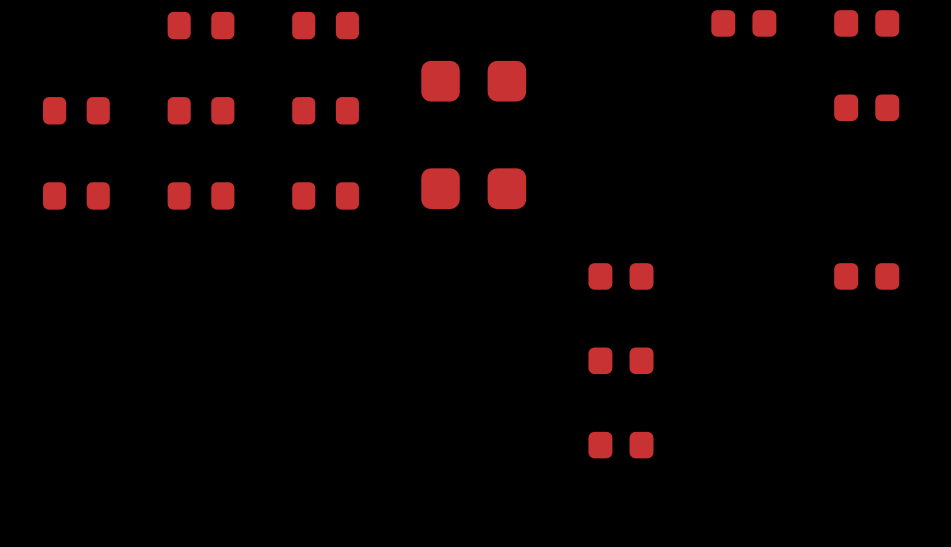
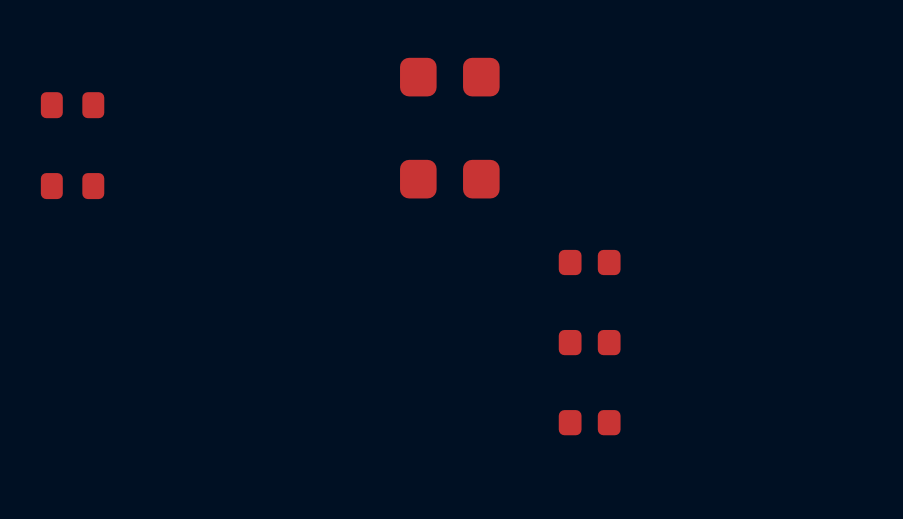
part: (743, 23) -> none
part: (866, 23) -> none
part: (200, 25) -> none
part: (325, 25) -> none
part: (866, 107) -> none
part: (200, 110) -> none
part: (325, 110) -> none
part: (200, 195) -> none
part: (325, 195) -> none
part: (866, 276) -> none

